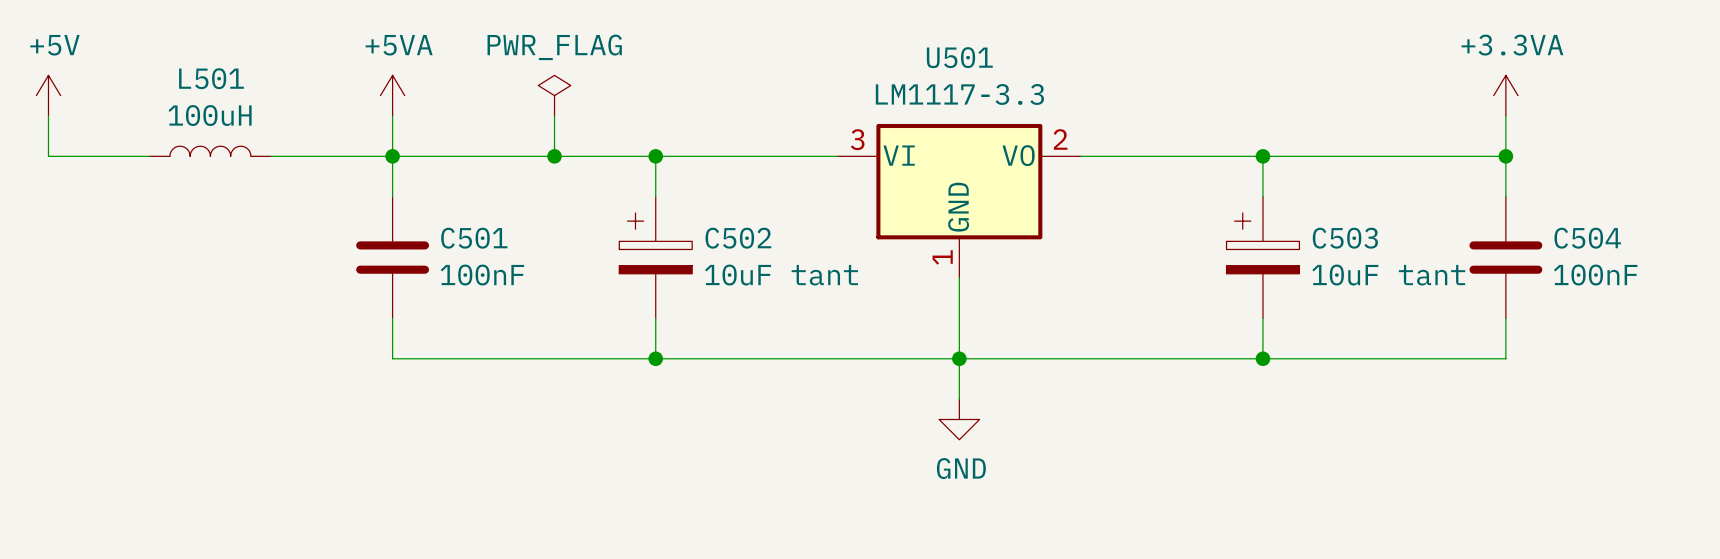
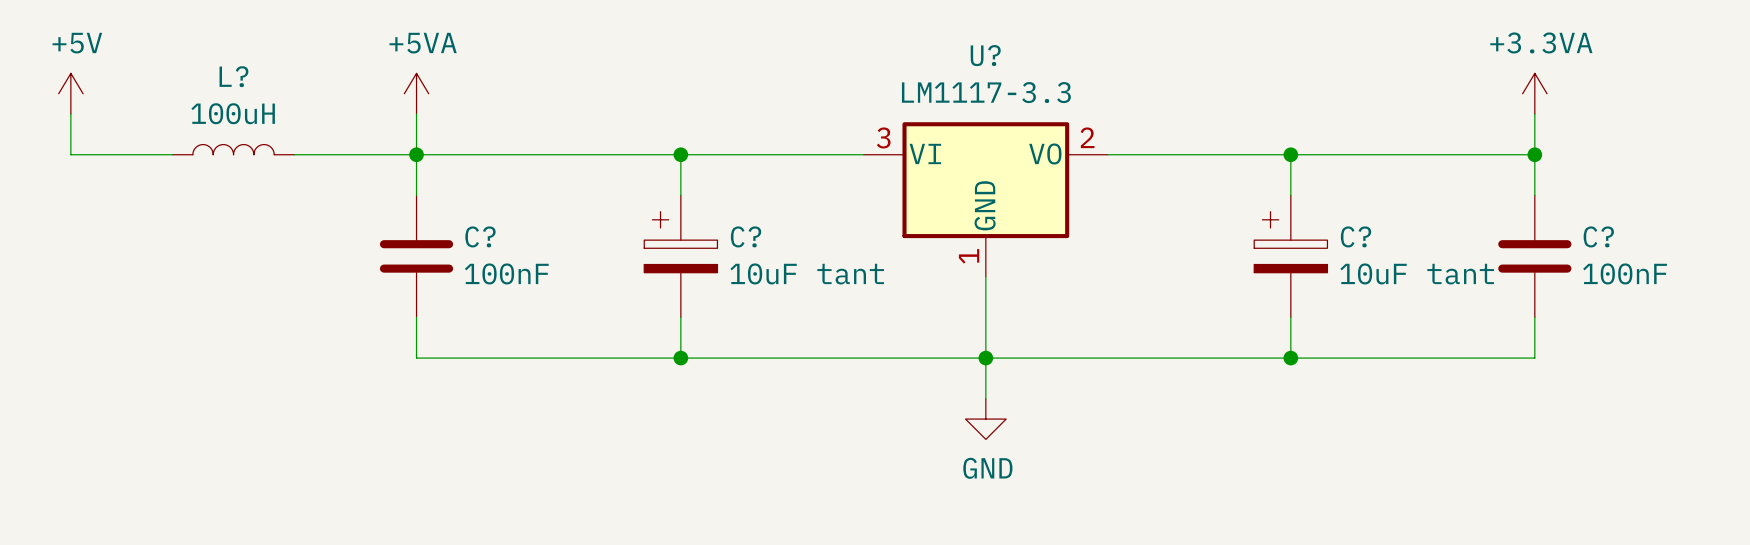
U501 name: U501 (959, 57) -> U? (985, 55)
L501 name: L501 (211, 78) -> L? (233, 76)
power symbol: PWR_FLAG (554, 95) -> none
wire: (554, 115) (554, 156) -> none
junction: (554, 156) -> none
C501 name: C501 (474, 238) -> C? (480, 236)
C502 name: C502 (738, 238) -> C? (746, 236)
C503 name: C503 (1345, 238) -> C? (1356, 236)
C504 name: C504 (1587, 238) -> C? (1598, 236)

